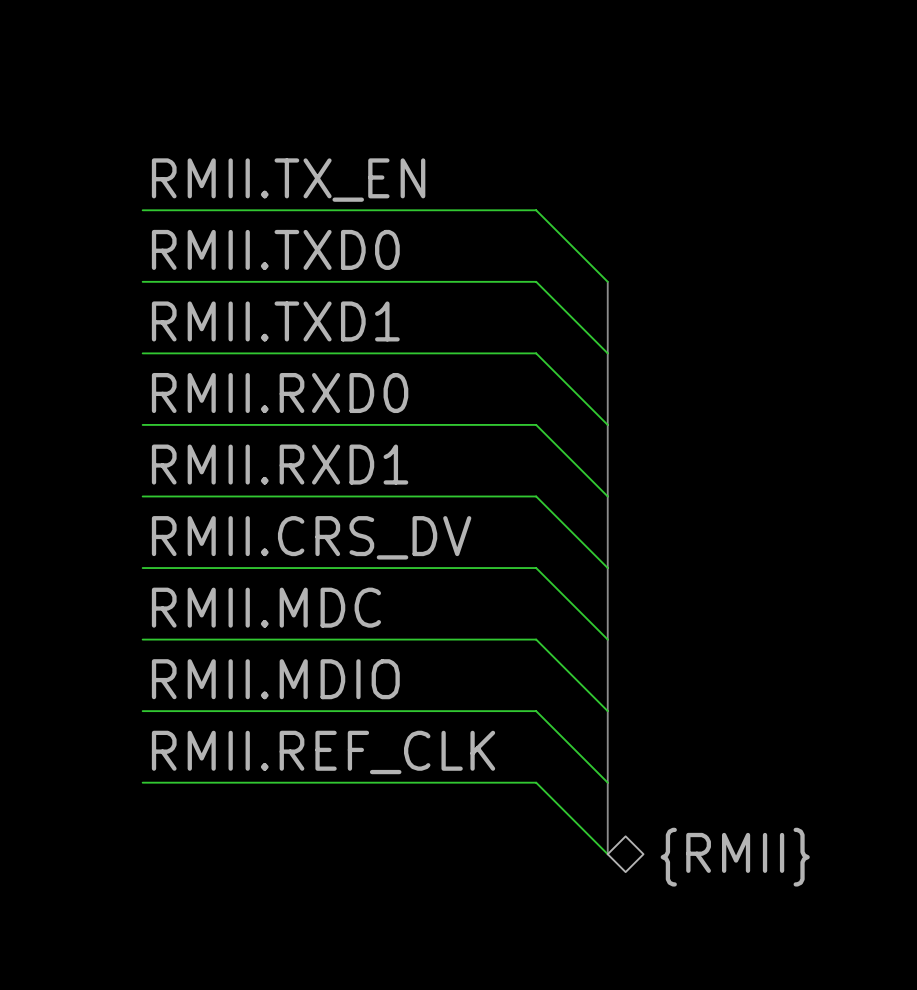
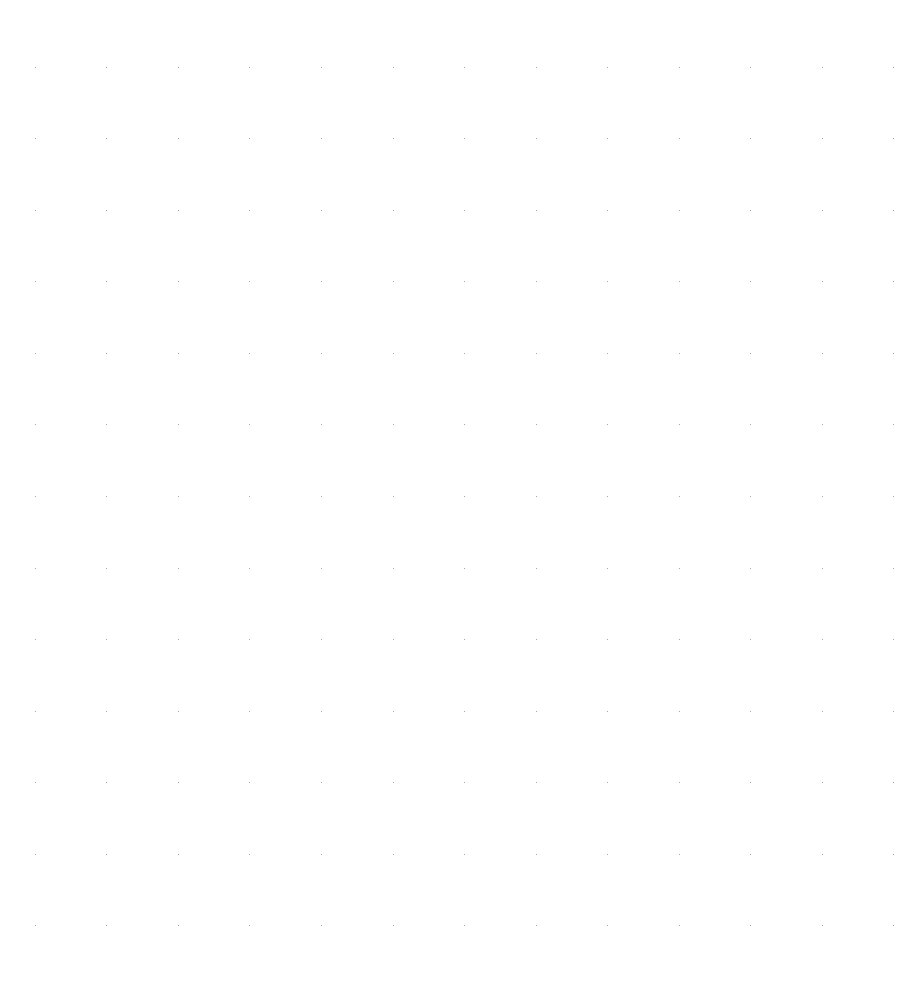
label: RMII.TX_EN (288, 180) -> none
wire: (142, 210) (536, 210) (607, 281) -> none
label: RMII.TXD0 (275, 249) -> none
wire: (142, 281) (536, 281) (607, 353) -> none
bus: (607, 281) (607, 854) -> none
label: RMII.TXD1 (275, 321) -> none
wire: (142, 353) (536, 353) (607, 424) -> none
label: RMII.RXD0 (280, 393) -> none
wire: (142, 424) (536, 424) (607, 496) -> none
label: RMII.RXD1 (280, 464) -> none
wire: (142, 496) (536, 496) (607, 568) -> none
label: RMII.CRS_DV (311, 537) -> none
wire: (142, 568) (536, 568) (607, 639) -> none
label: RMII.MDC (266, 607) -> none
wire: (142, 639) (536, 639) (607, 711) -> none
label: RMII.MDIO (275, 679) -> none
wire: (142, 711) (536, 711) (607, 782) -> none
label: RMII.REF_CLK (323, 752) -> none
wire: (142, 782) (536, 782) (607, 854) -> none
hierarchical label: {RMII} (735, 857) -> none

